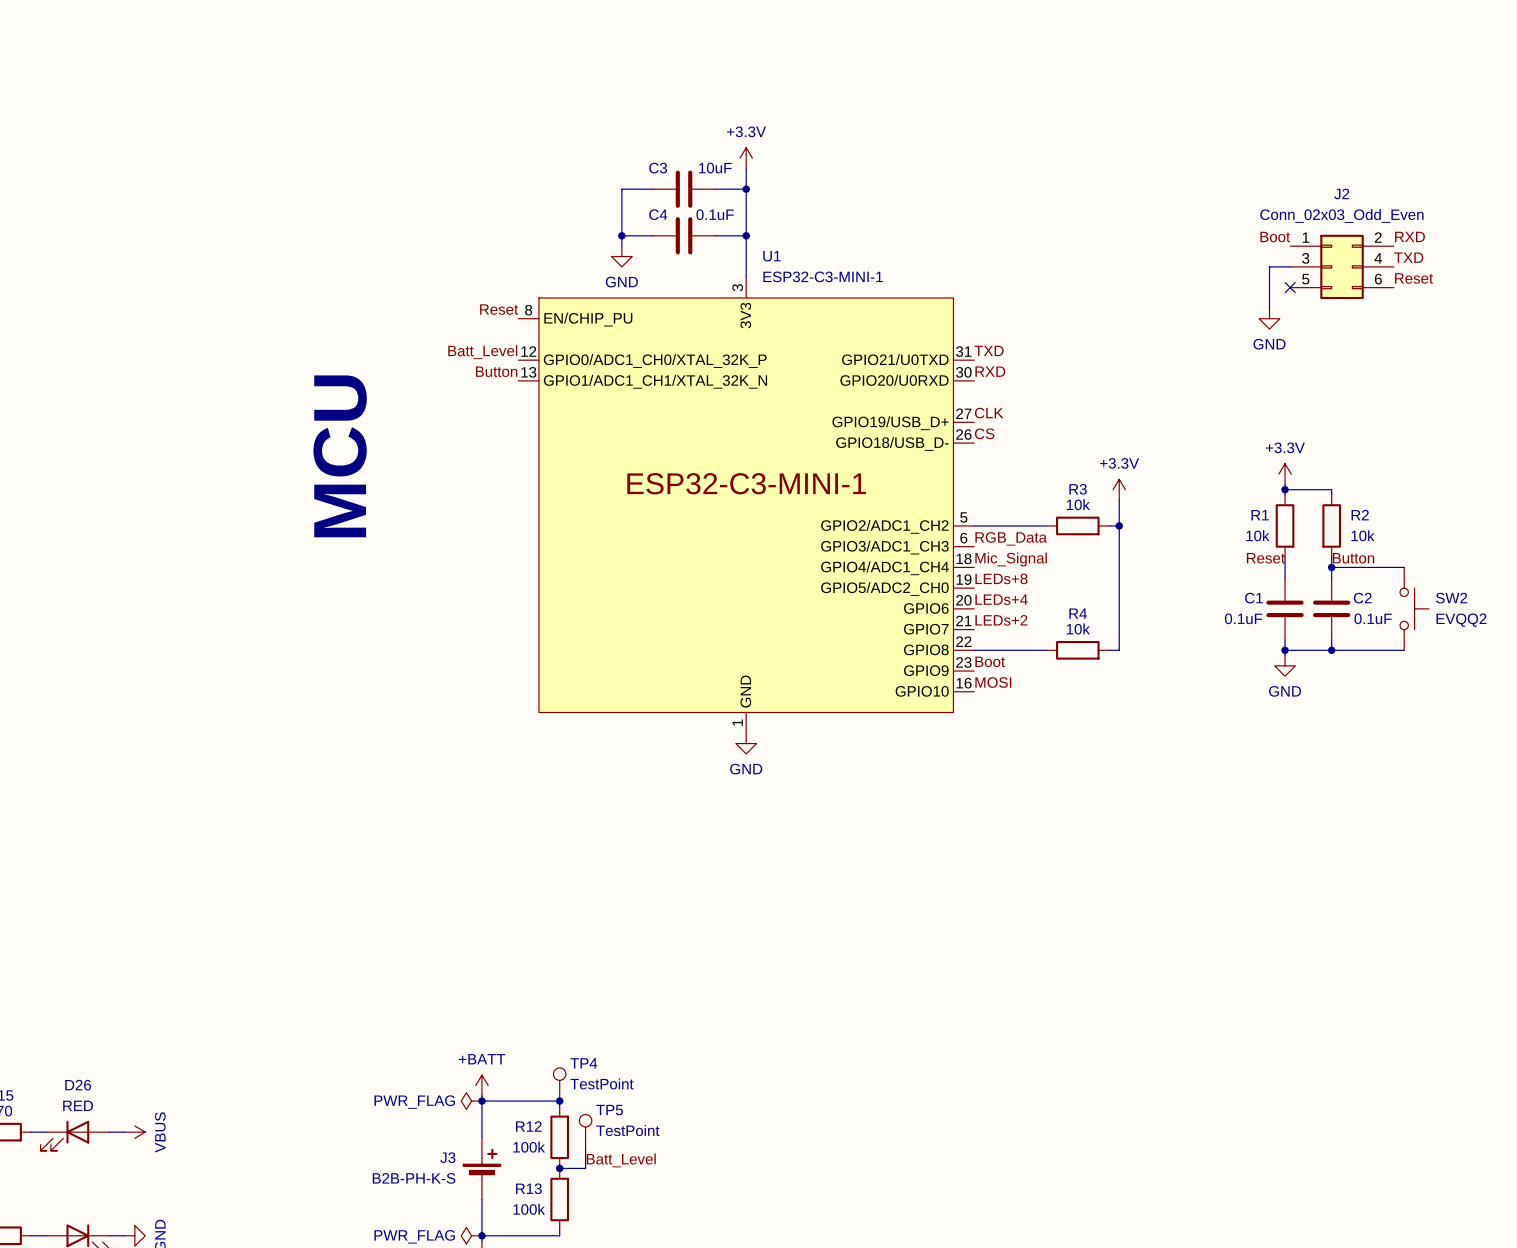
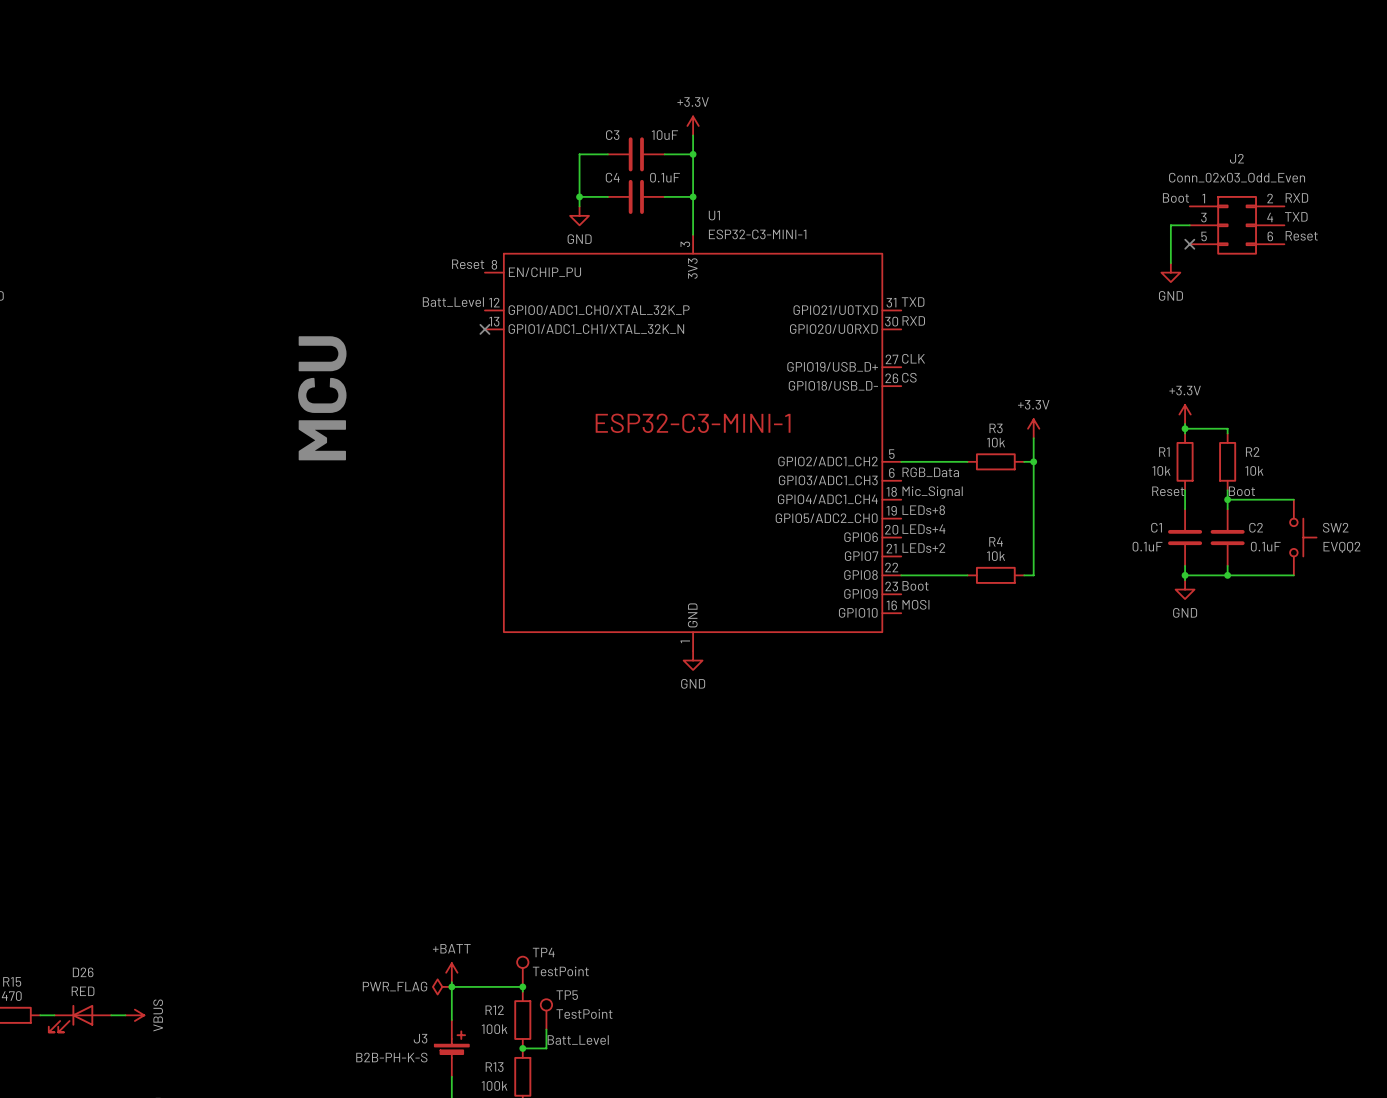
label: Button (496, 371) -> none
no-connect mark: none -> (484, 329)
label: Button (1353, 558) -> Boot (1241, 491)

